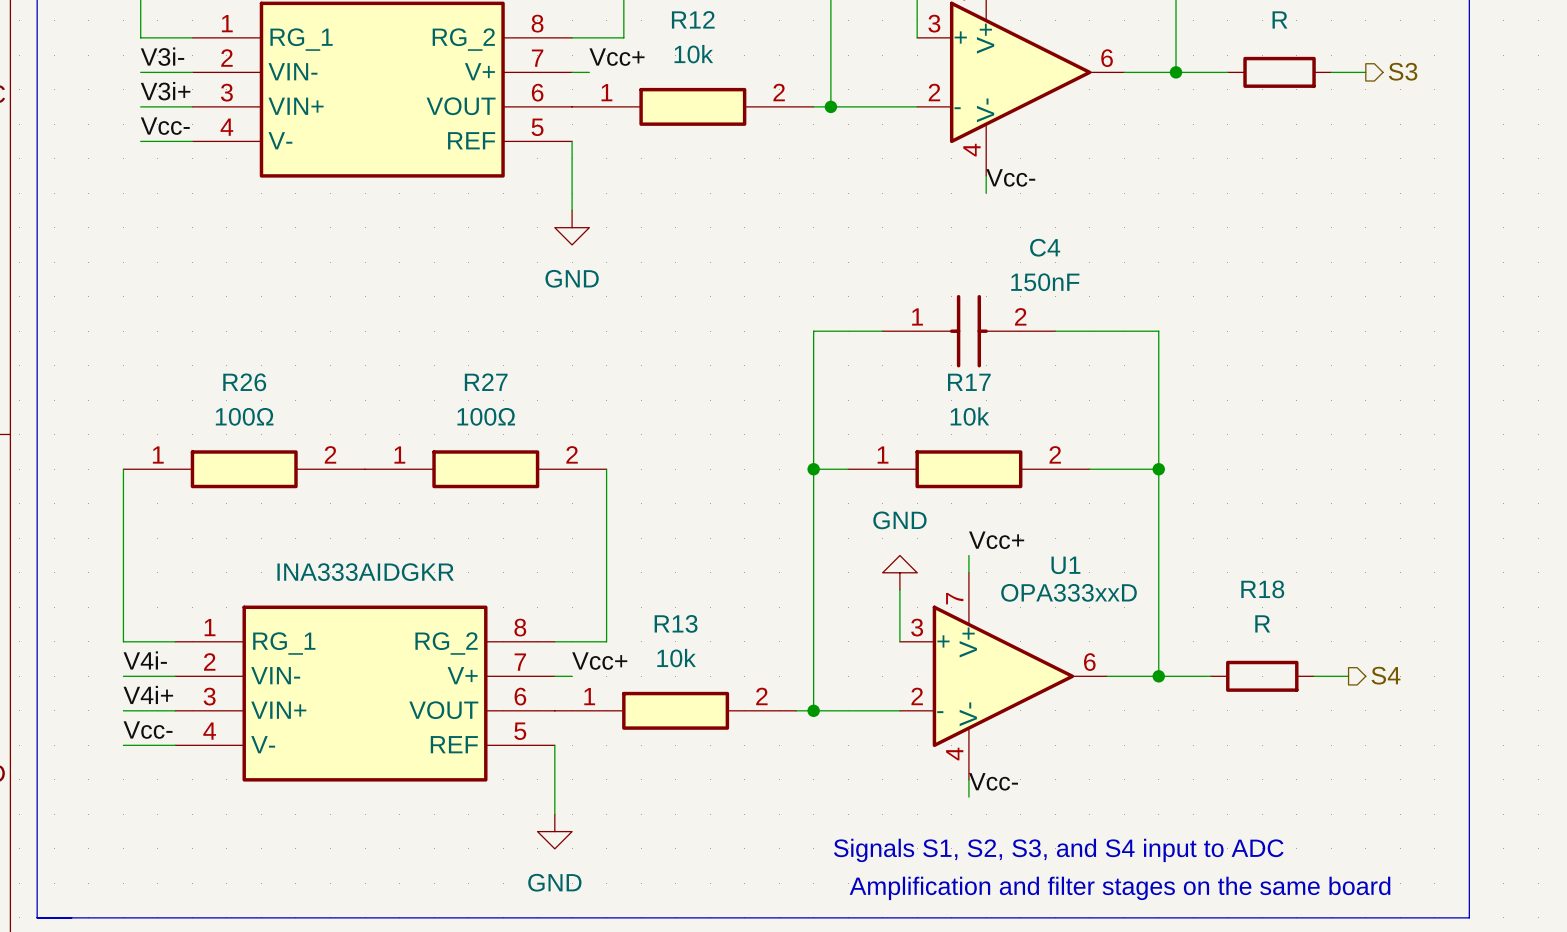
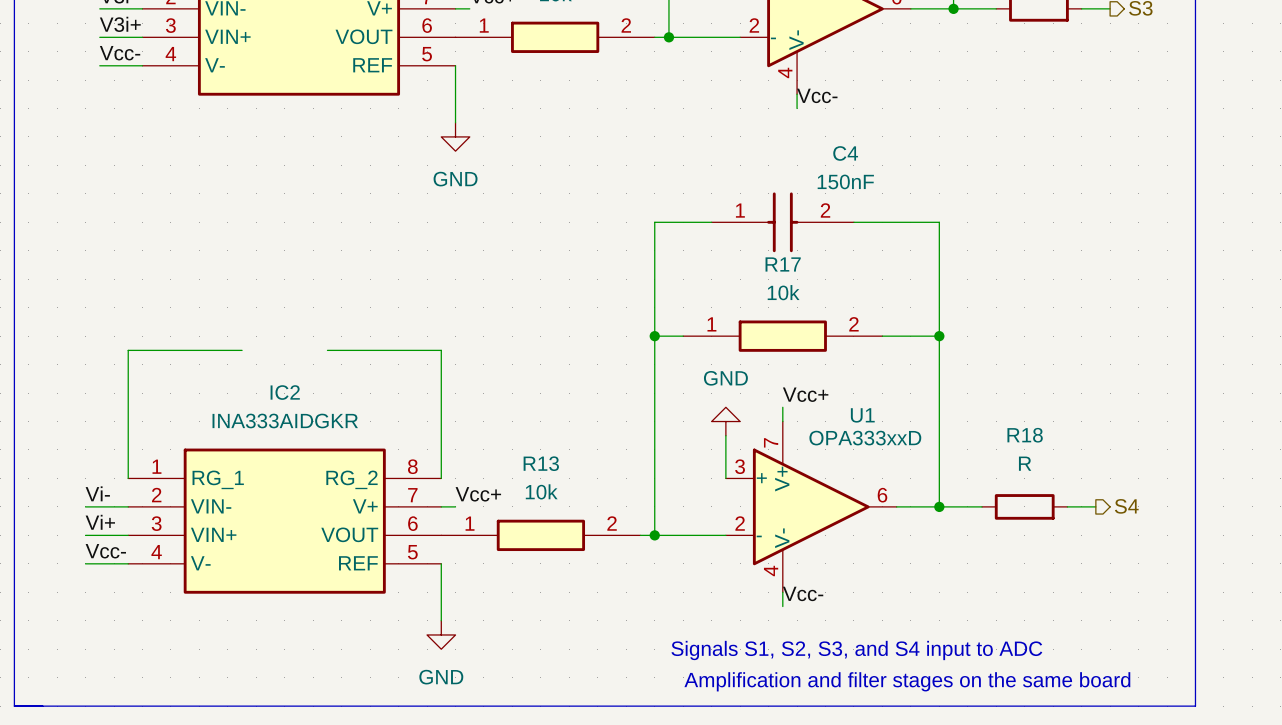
wire: (123, 469) (123, 641) (175, 641) -> (242, 350) (128, 350) (128, 478)
R26: 100Ω (244, 469) -> none
R27: 100Ω (485, 469) -> none
wire: (606, 469) (606, 641) (554, 641) -> (327, 350) (441, 350) (441, 478)
IC2 name: none -> IC2 (285, 392)
label: V4i- (145, 660) -> Vi- (97, 493)
label: V4i+ (148, 694) -> Vi+ (100, 522)

